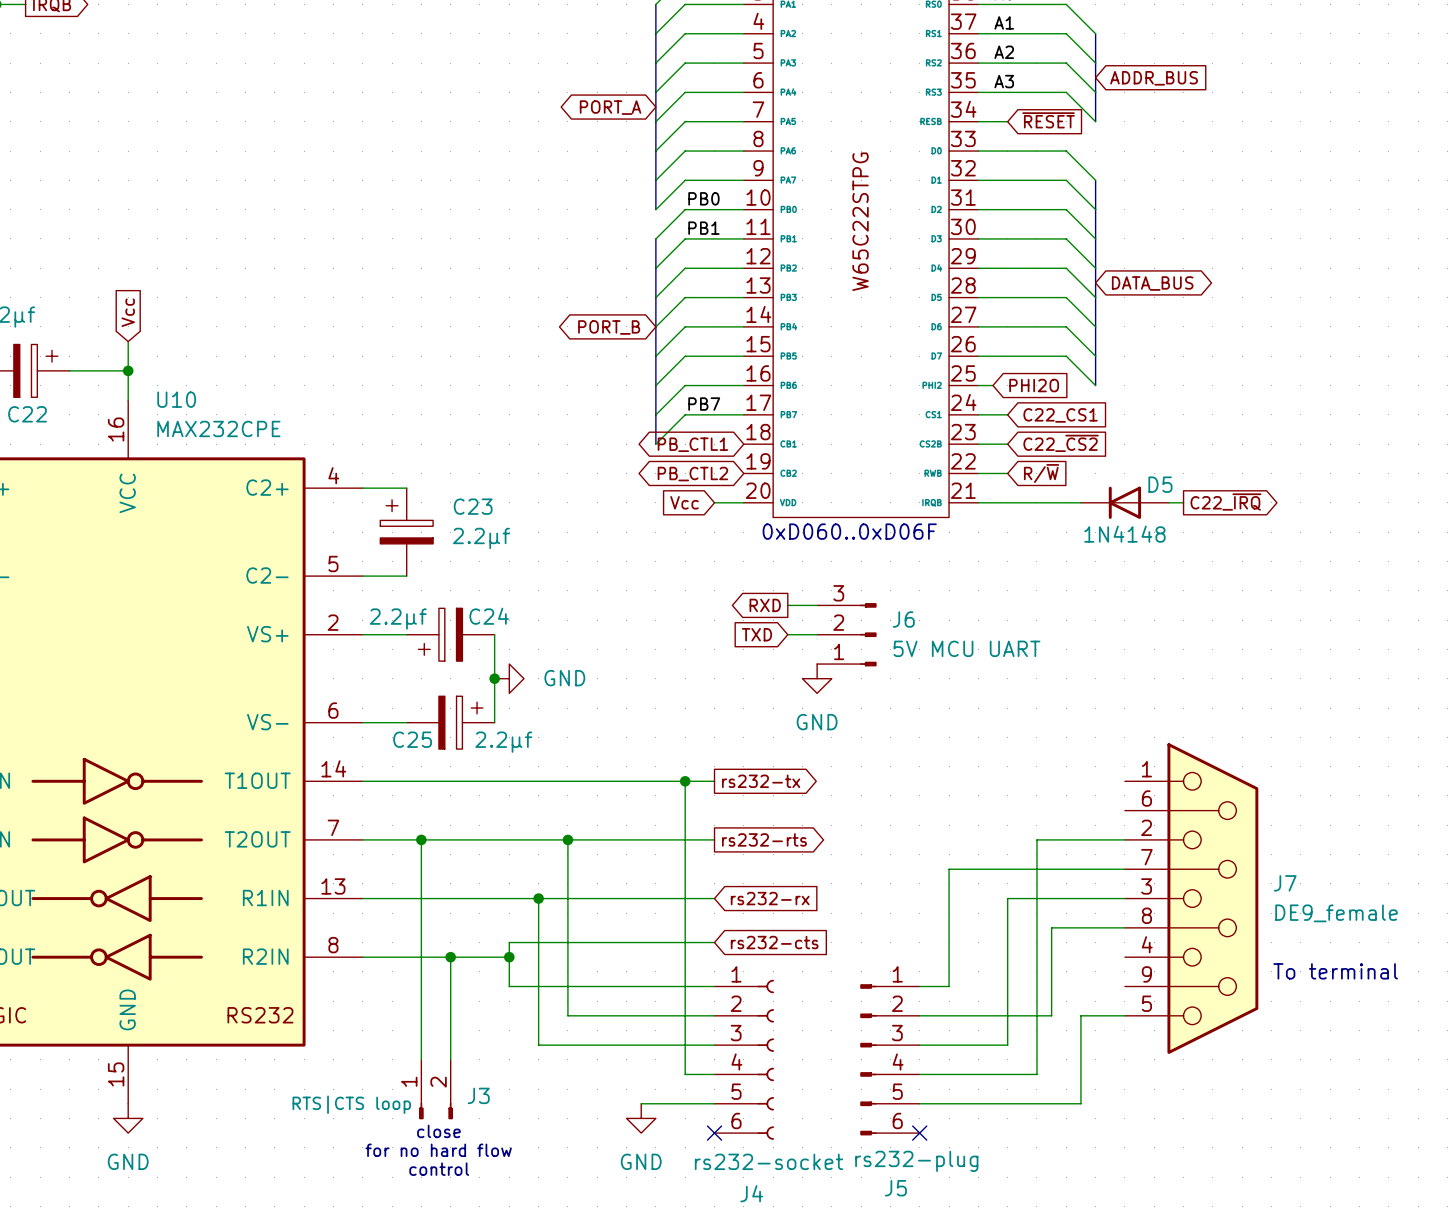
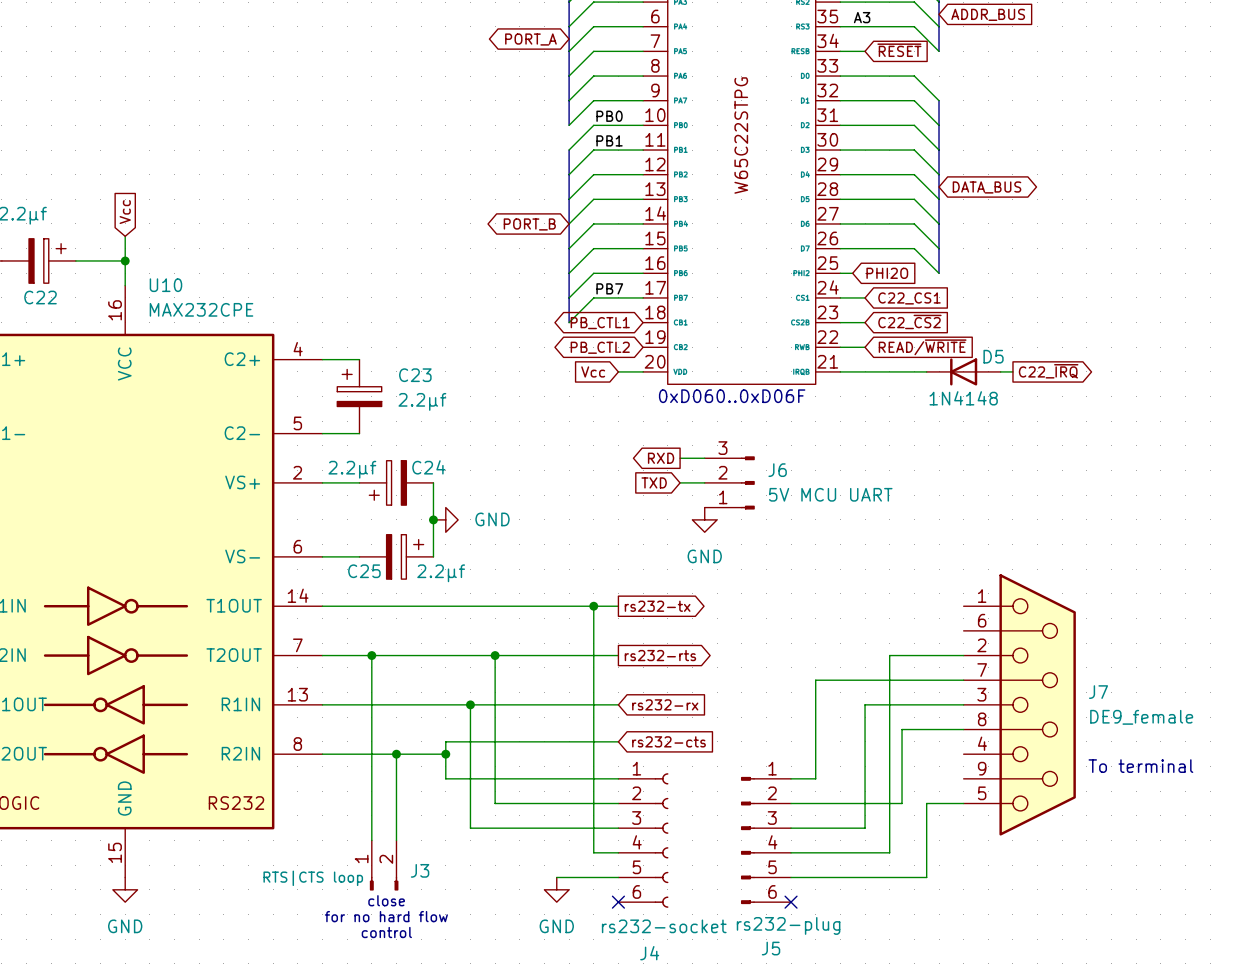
global label: R/~{W} (1041, 473) -> READ/~{WRITE} (922, 347)

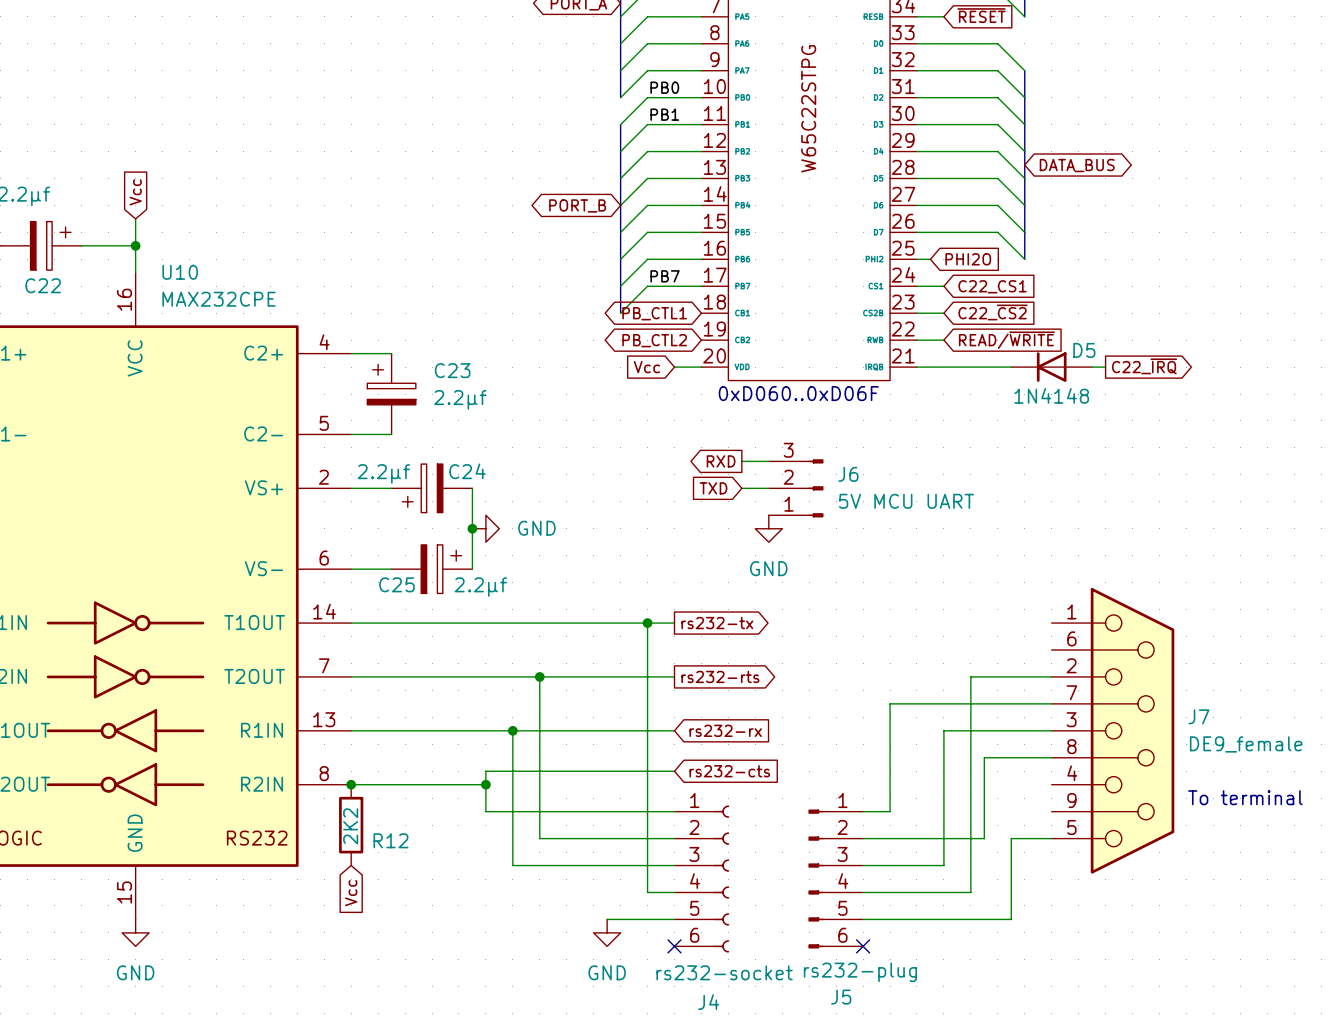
wire: (371, 655) (371, 840) -> none
junction: (371, 655) -> none
junction: none -> (351, 784)
wire: (396, 754) (396, 840) -> none
junction: (396, 754) -> none
R12: none -> 2K2 (351, 825)
global label: none -> Vcc (351, 893)
J3: RTS|CTS loop (384, 865) -> none
text: close (386, 900) -> none
text: for no hard flow (386, 916) -> none
text: control (386, 932) -> none

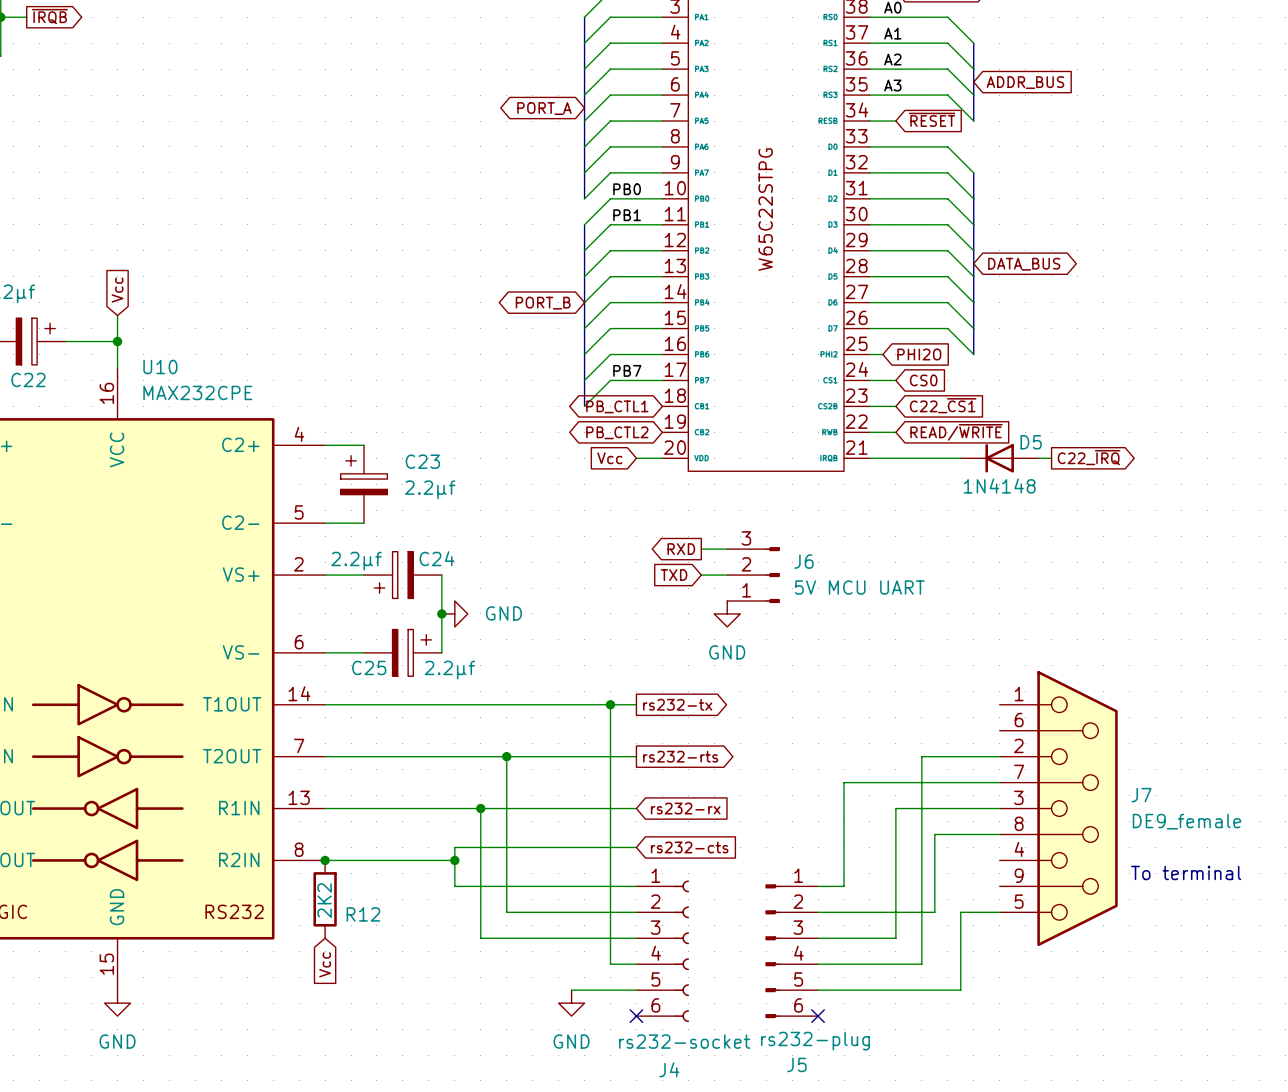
global label: C22_CS1 (992, 286) -> CS0 (923, 380)
global label: C22_~{CS2} (993, 312) -> C22_~{CS1} (943, 405)
text: 0xD060..0xD06F (798, 393) -> none

